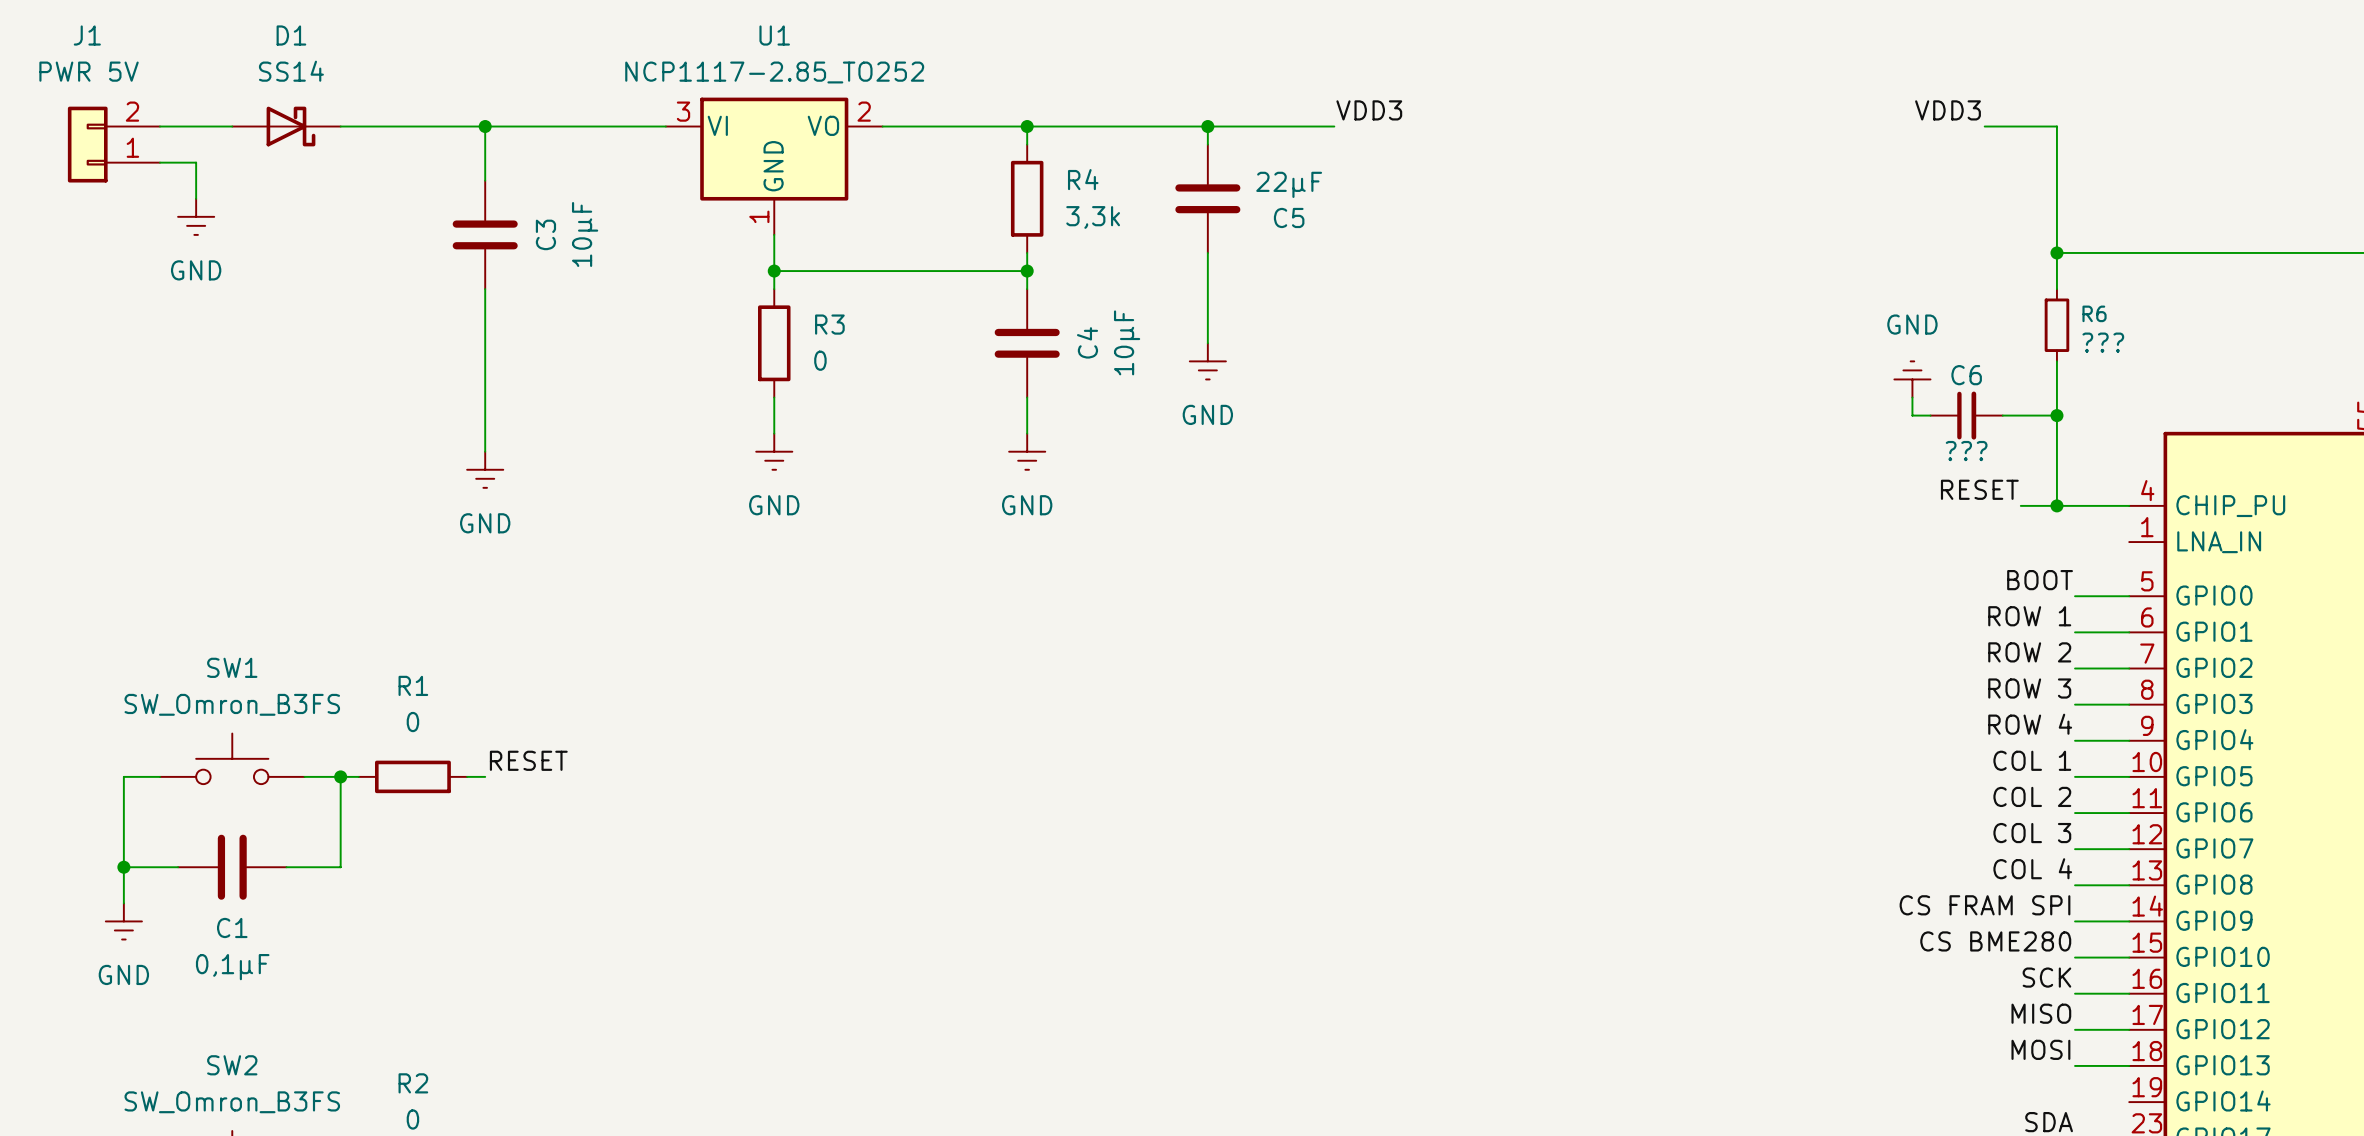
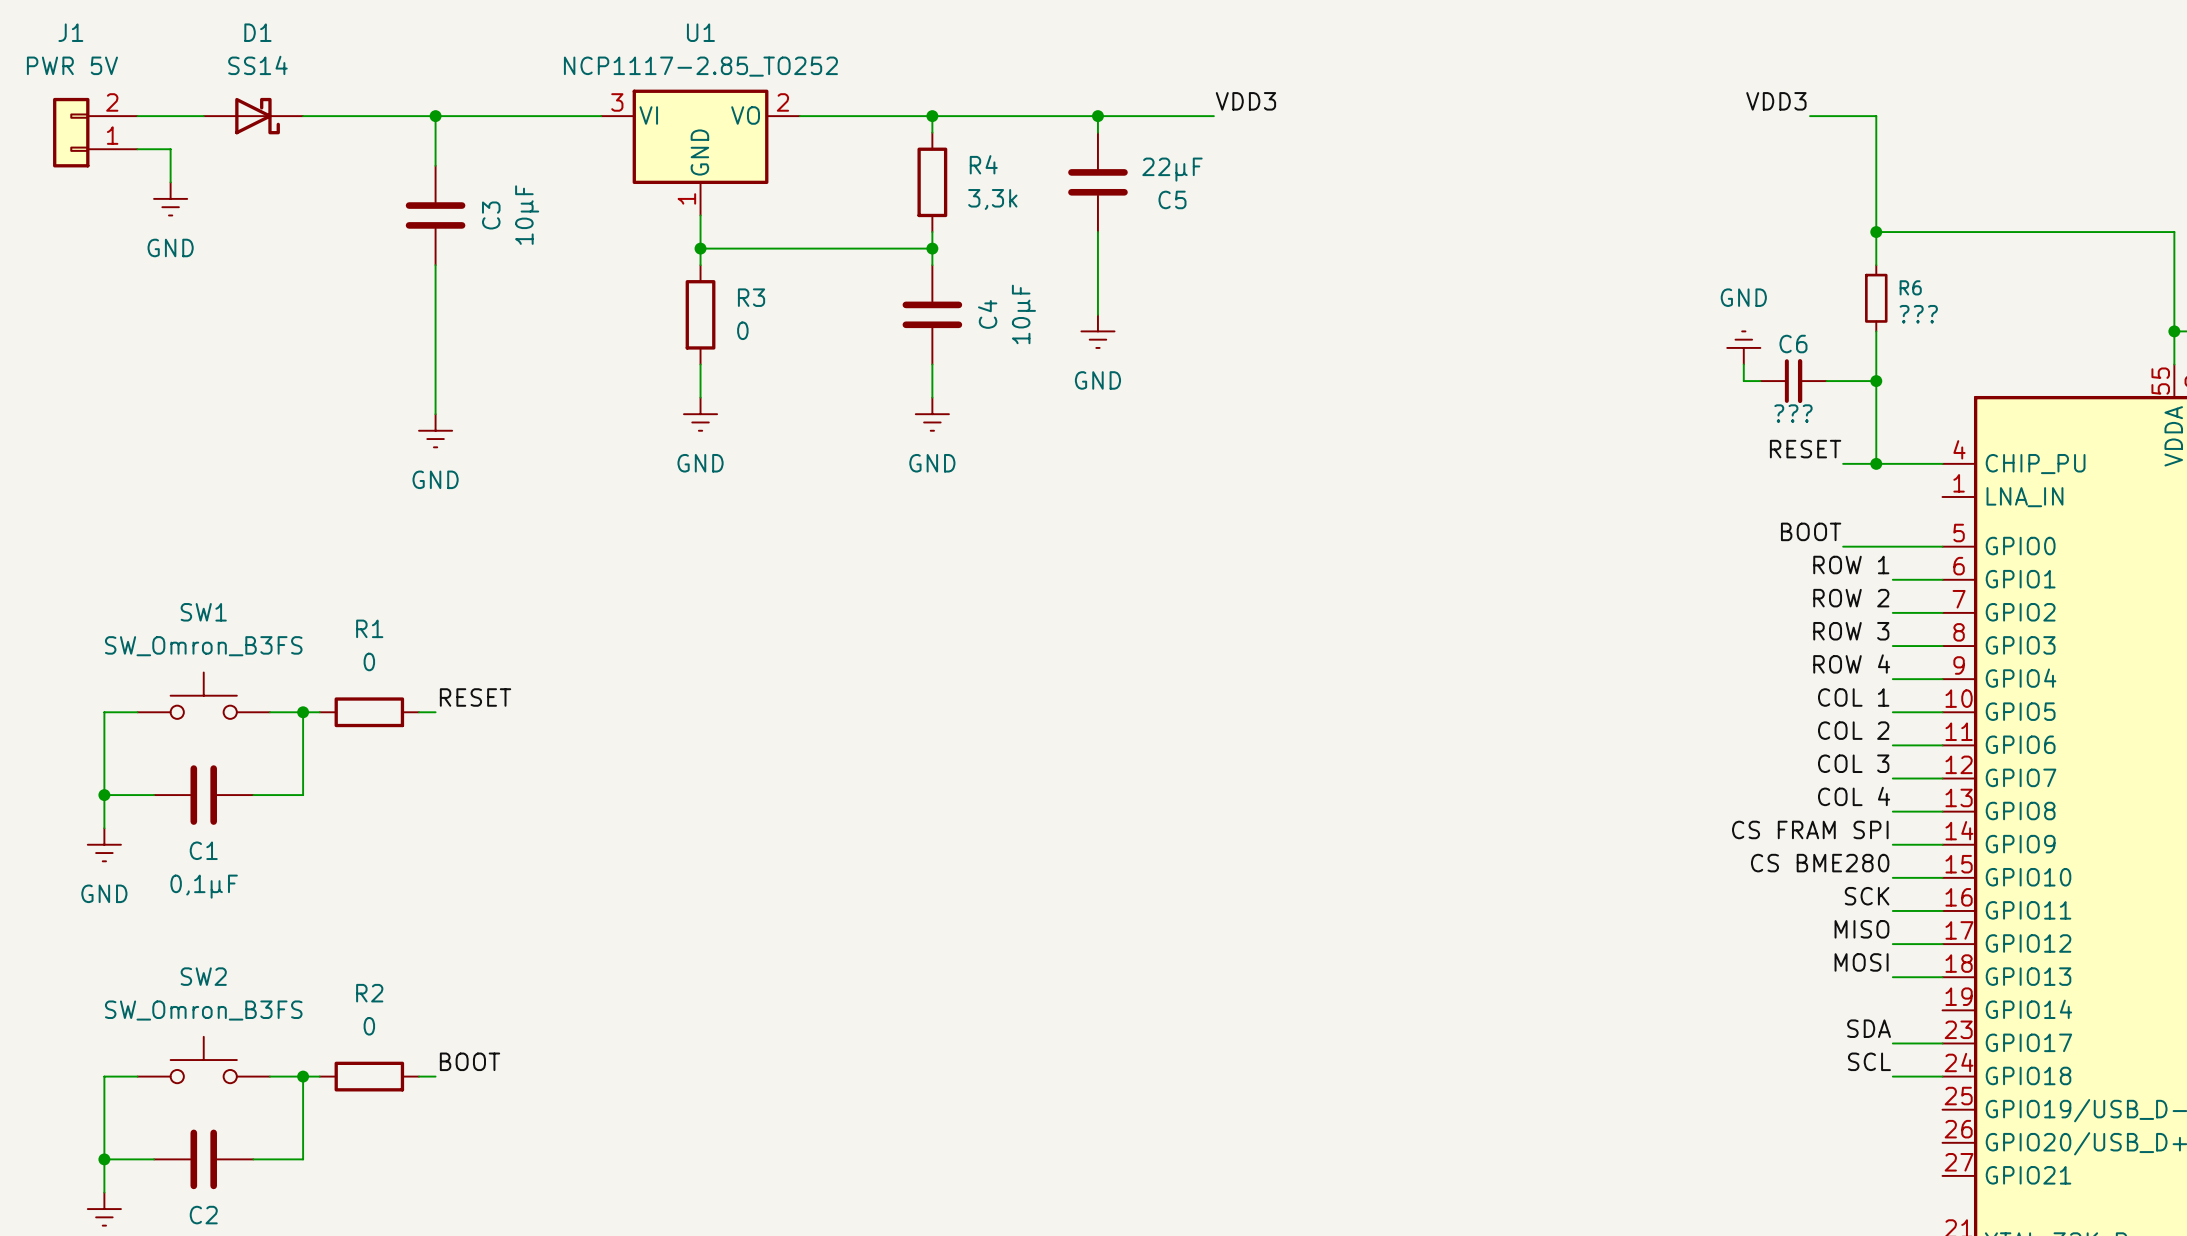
label position: BOOT (2040, 580) -> BOOT (1811, 531)
wire: none -> (1843, 546) (1892, 546)

